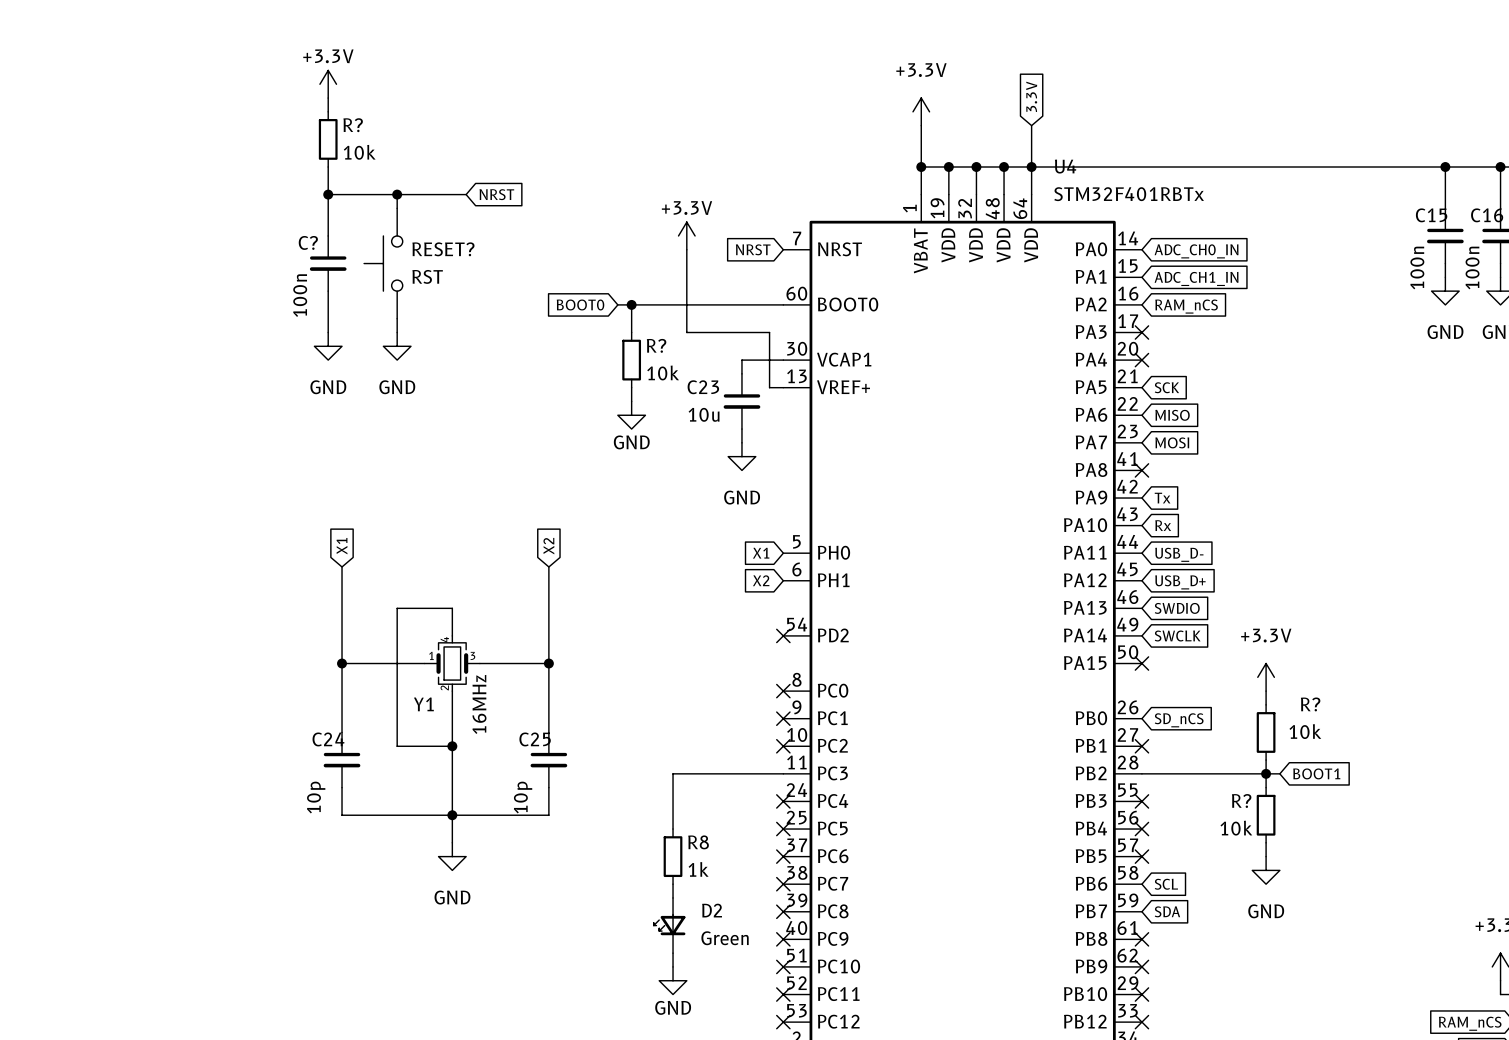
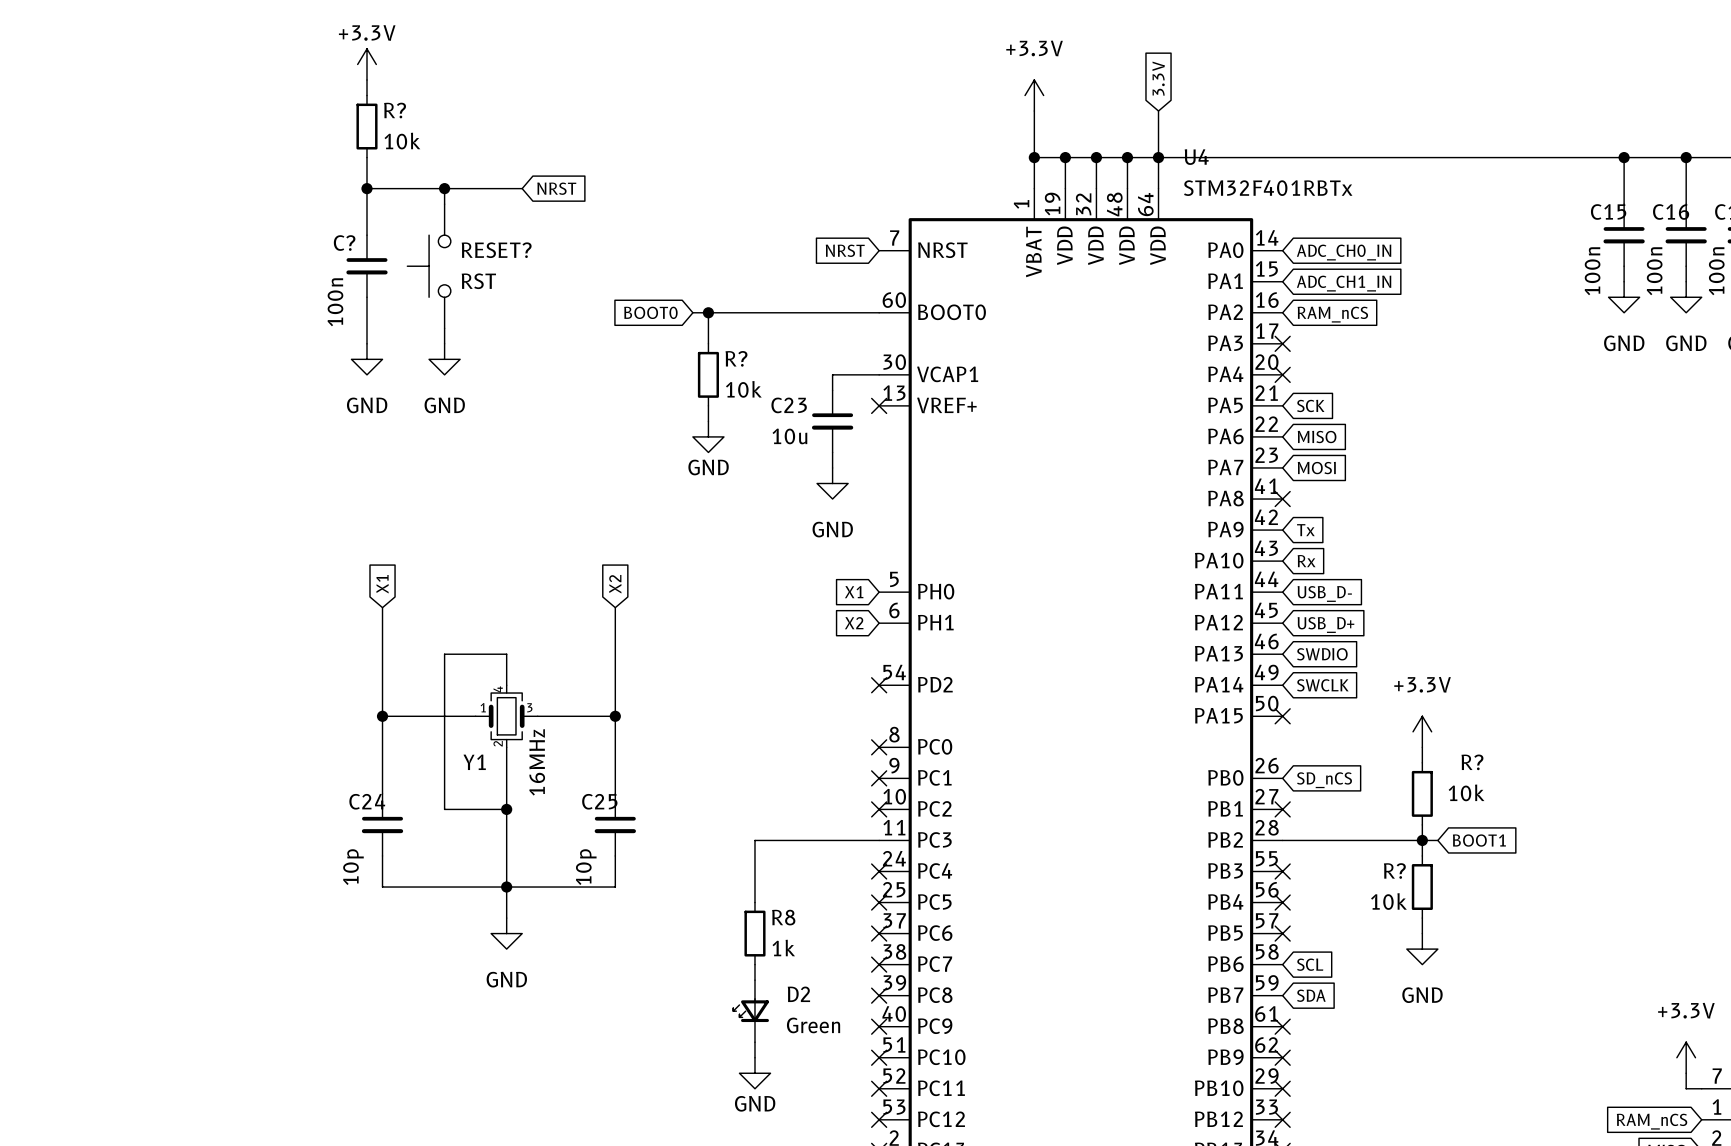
power symbol: +3.3V (686, 235) -> none
wire: (686, 249) (686, 332) (769, 332) (769, 387) (783, 387) -> none
no-connect mark: none -> (879, 405)

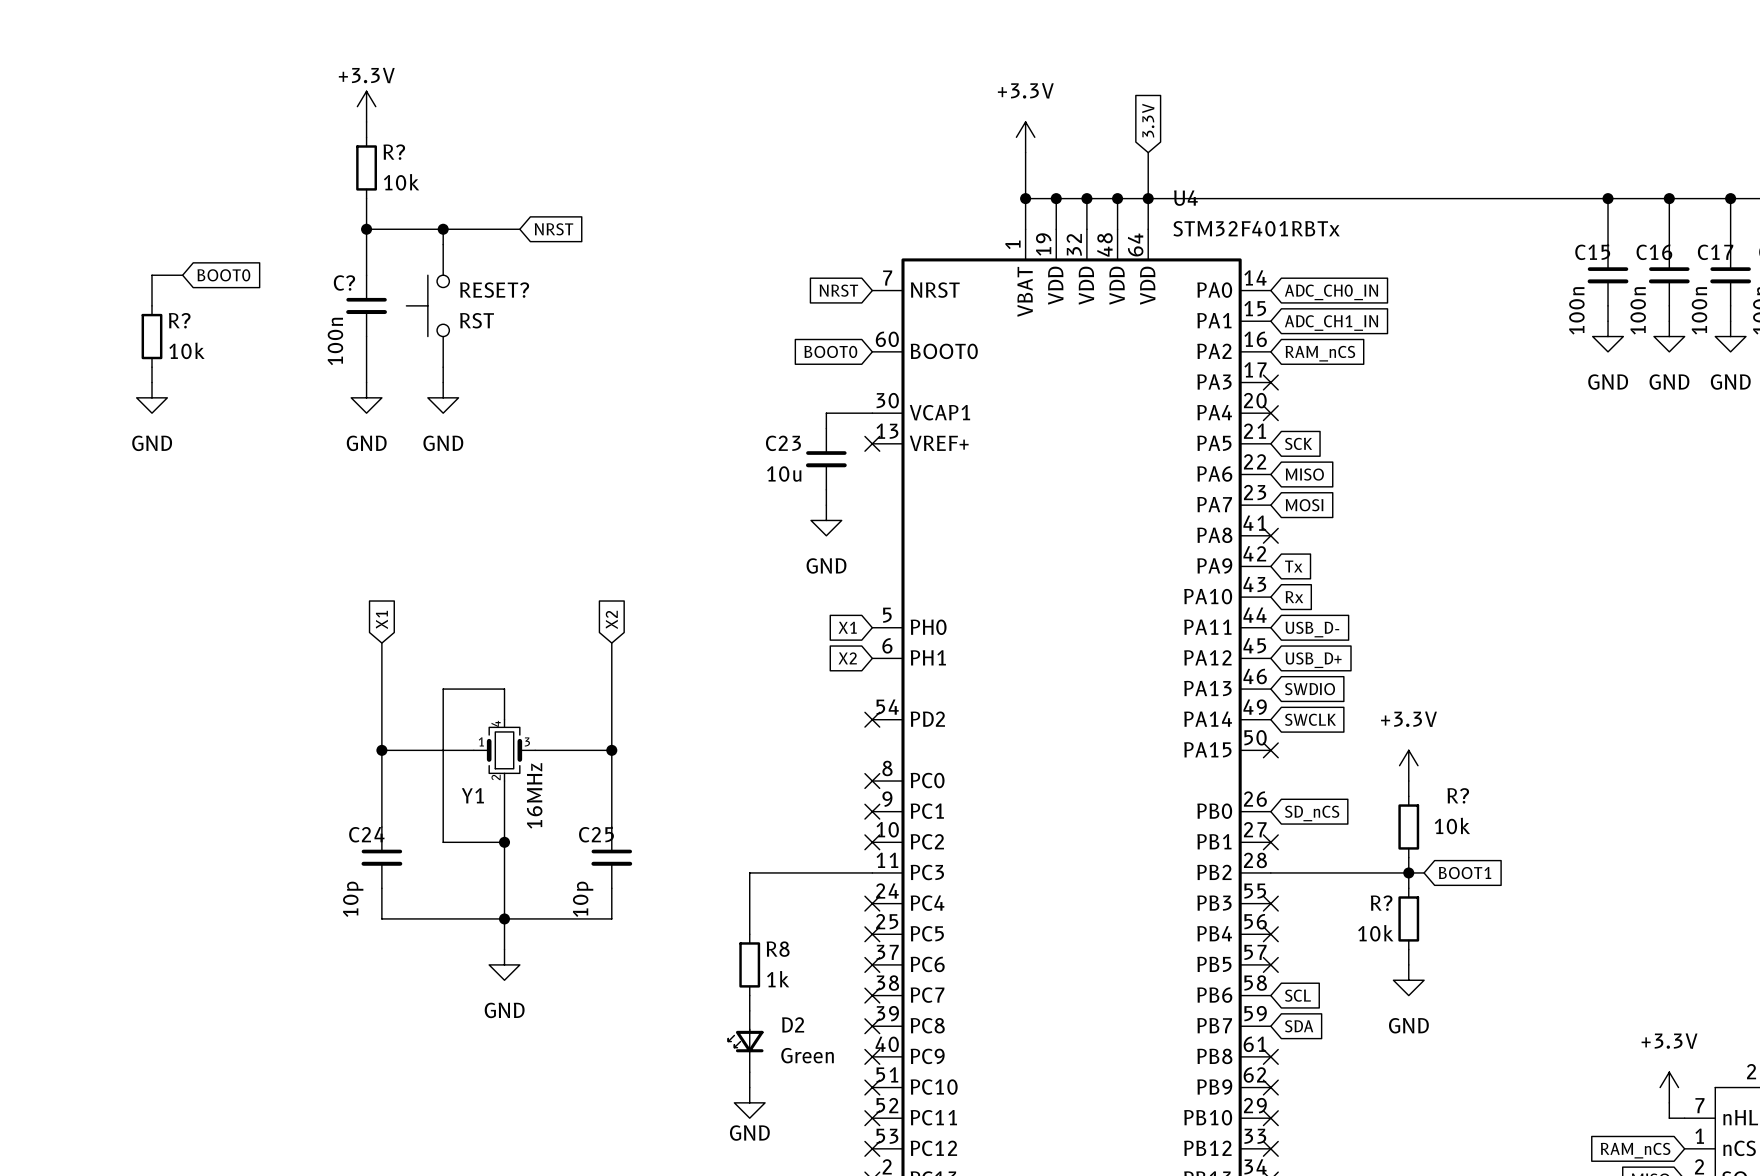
wire: none -> (182, 275) (151, 275) (151, 305)
global label: none -> BOOT0 (223, 275)
R?: none -> 10k (151, 336)
global label position: BOOT0 (650, 312) -> BOOT0 (830, 351)
wire: (692, 312) (879, 312) -> none
wire: (708, 312) (708, 343) -> none
junction: (708, 312) -> none
wire: none -> (151, 367) (151, 382)
power symbol: none -> GND (151, 397)
R?: 10k (708, 374) -> none
wire: (708, 405) (708, 421) -> none
power symbol: GND (708, 436) -> none

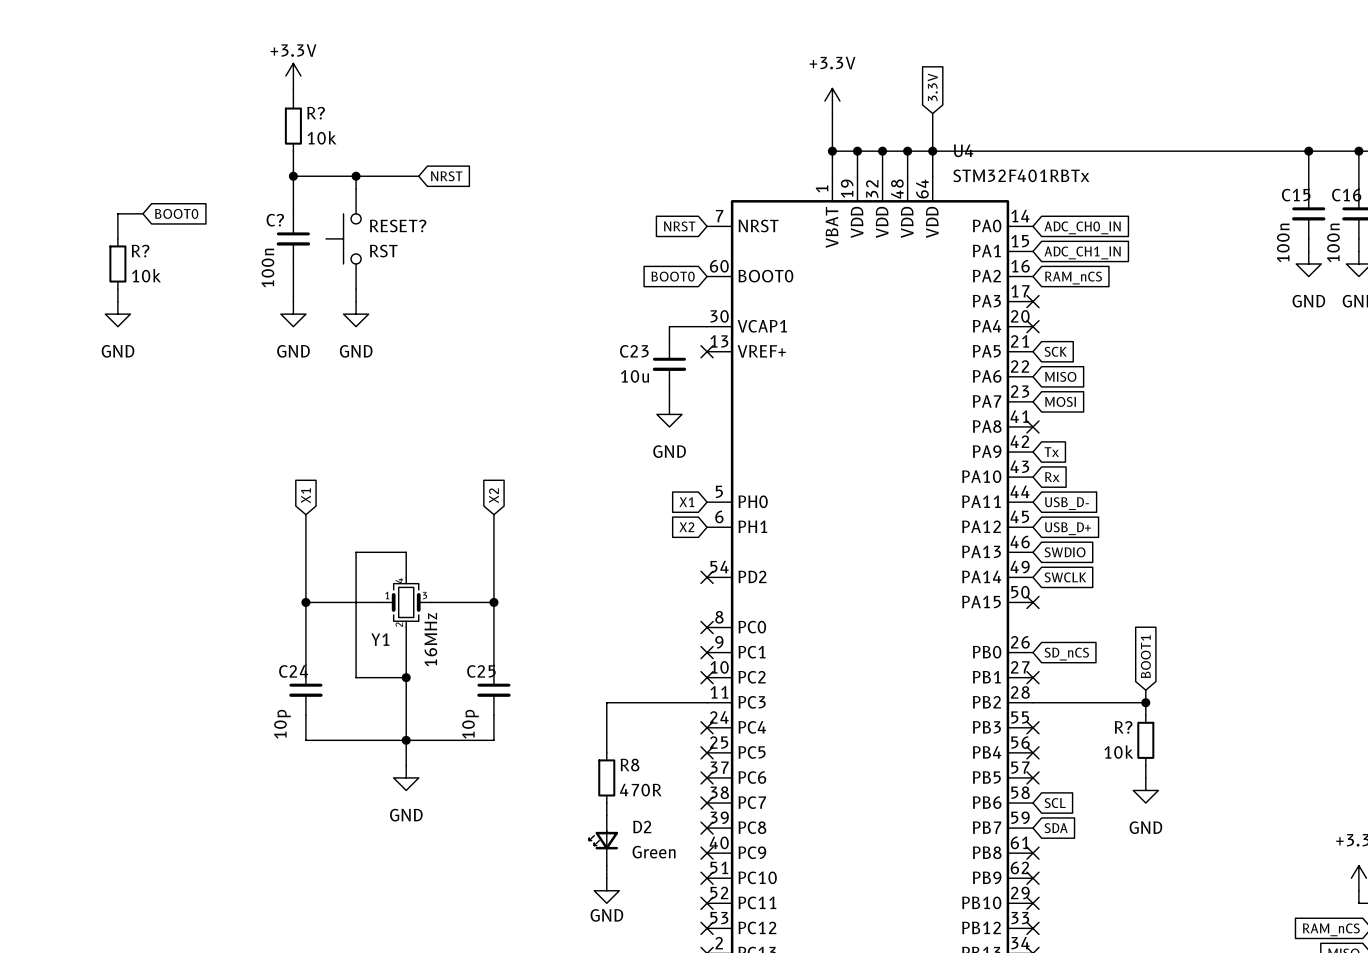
power symbol: +3.3V (1408, 765) -> none
wire: (1408, 781) (1408, 796) -> none
R?: 10k (1408, 826) -> none
wire: (1408, 872) (1424, 872) -> none
global label rotation: 0° (1465, 873) -> 90° counterclockwise (1145, 656)
R8 value: 1k (778, 979) -> 470R (640, 790)

